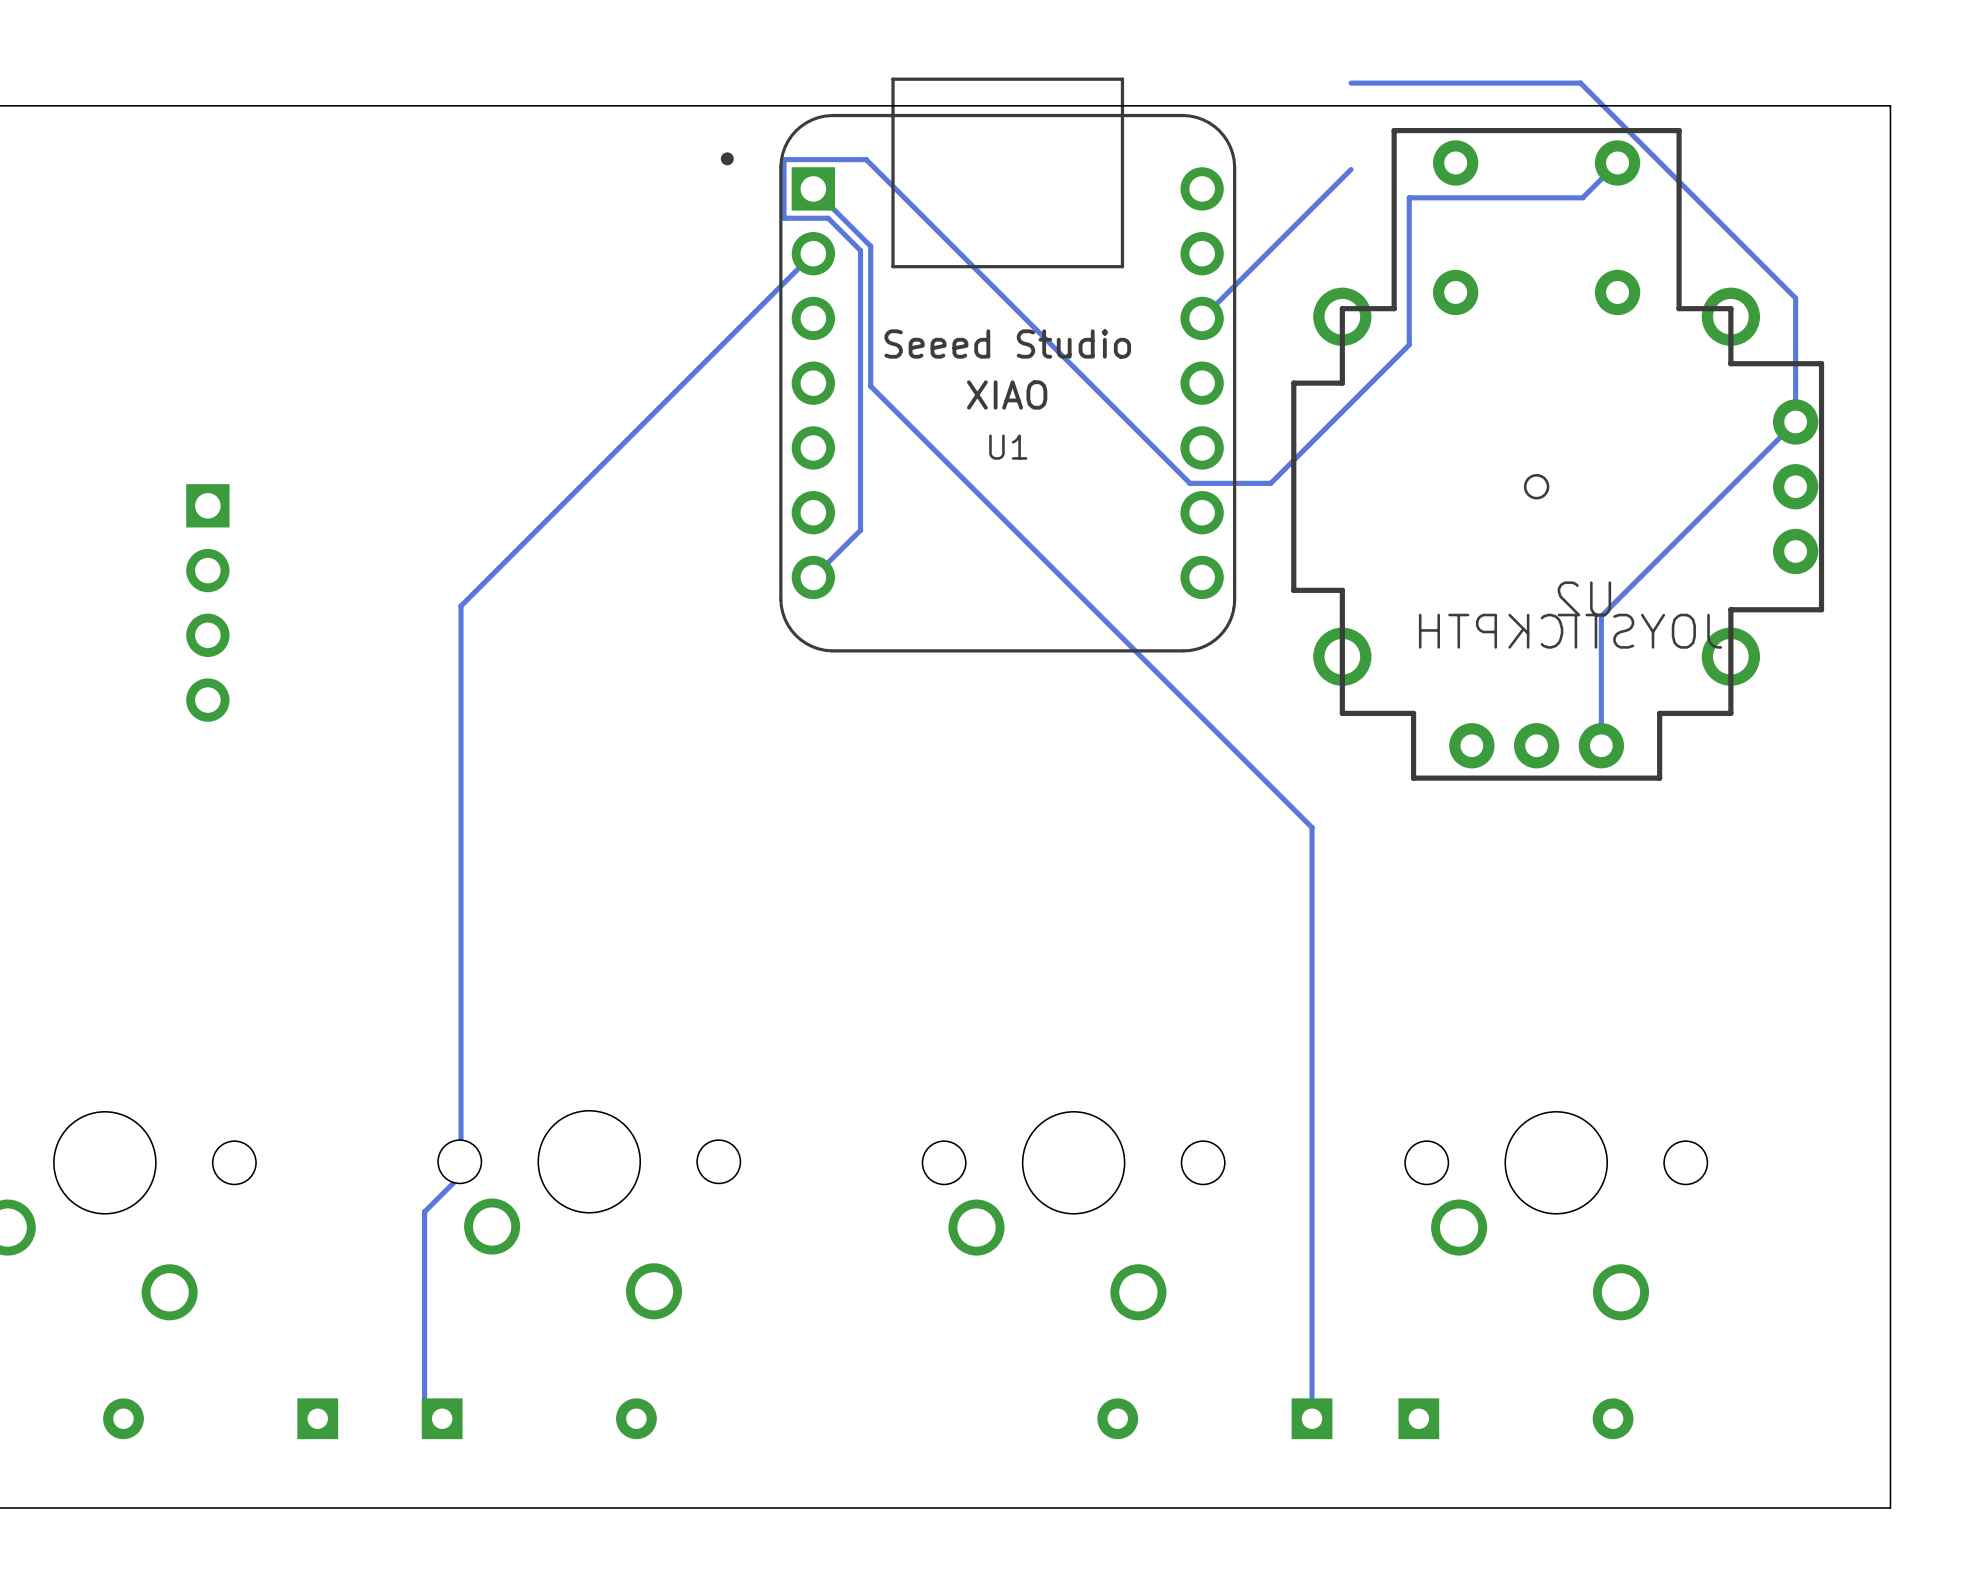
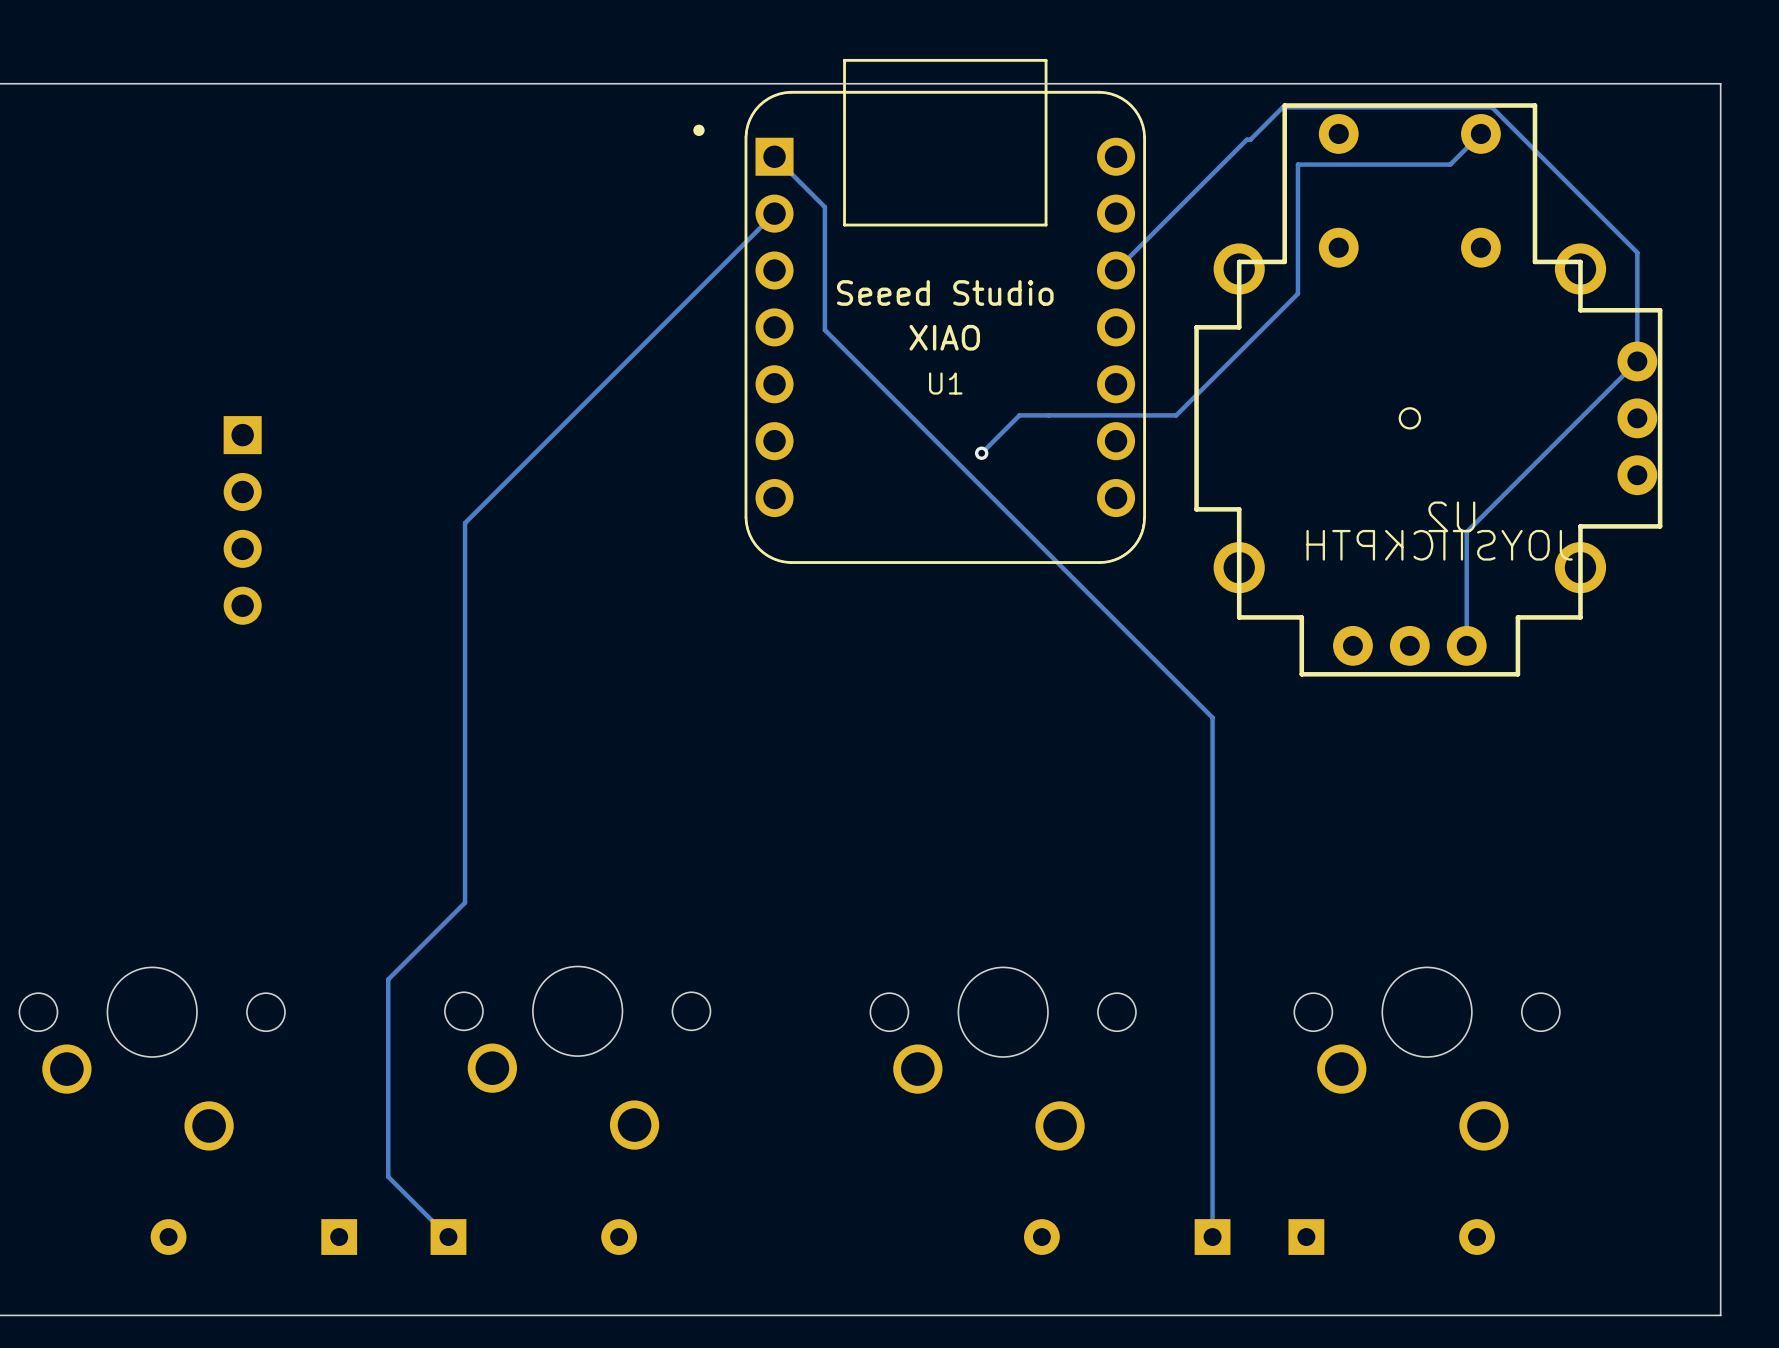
track: (1351, 83) (1580, 83) (1630, 132) -> (1246, 139) (1250, 139) (1282, 107) (1491, 107)
track: (1189, 483) (866, 159) (784, 159) (784, 218) (828, 218) (860, 250) (860, 530) (813, 577) -> (1105, 415) (1019, 415) (981, 453)
via: none -> (981, 453)
track: (461, 1038) (461, 1175) (424, 1211) (424, 1401) -> (465, 902) (388, 979) (388, 1176) (433, 1221)

